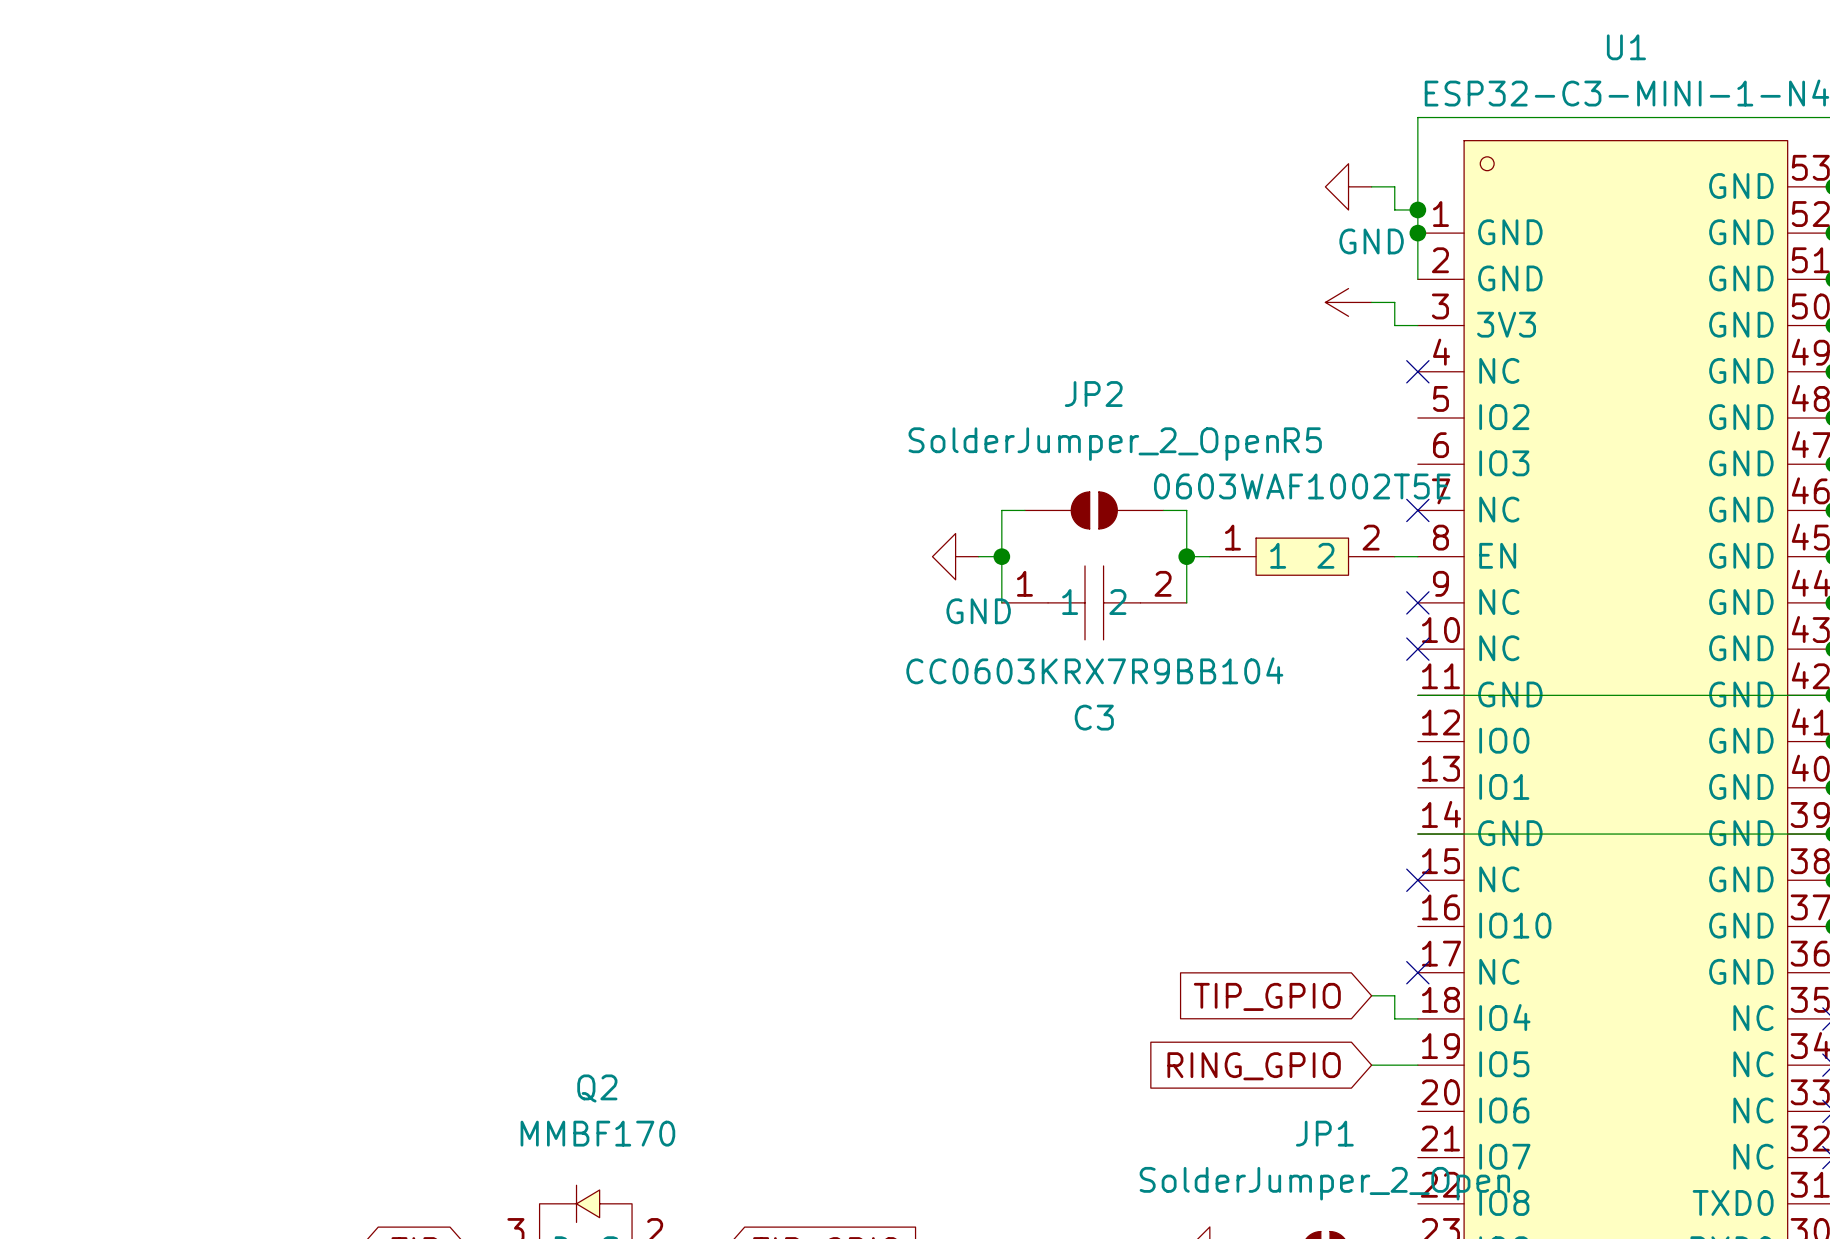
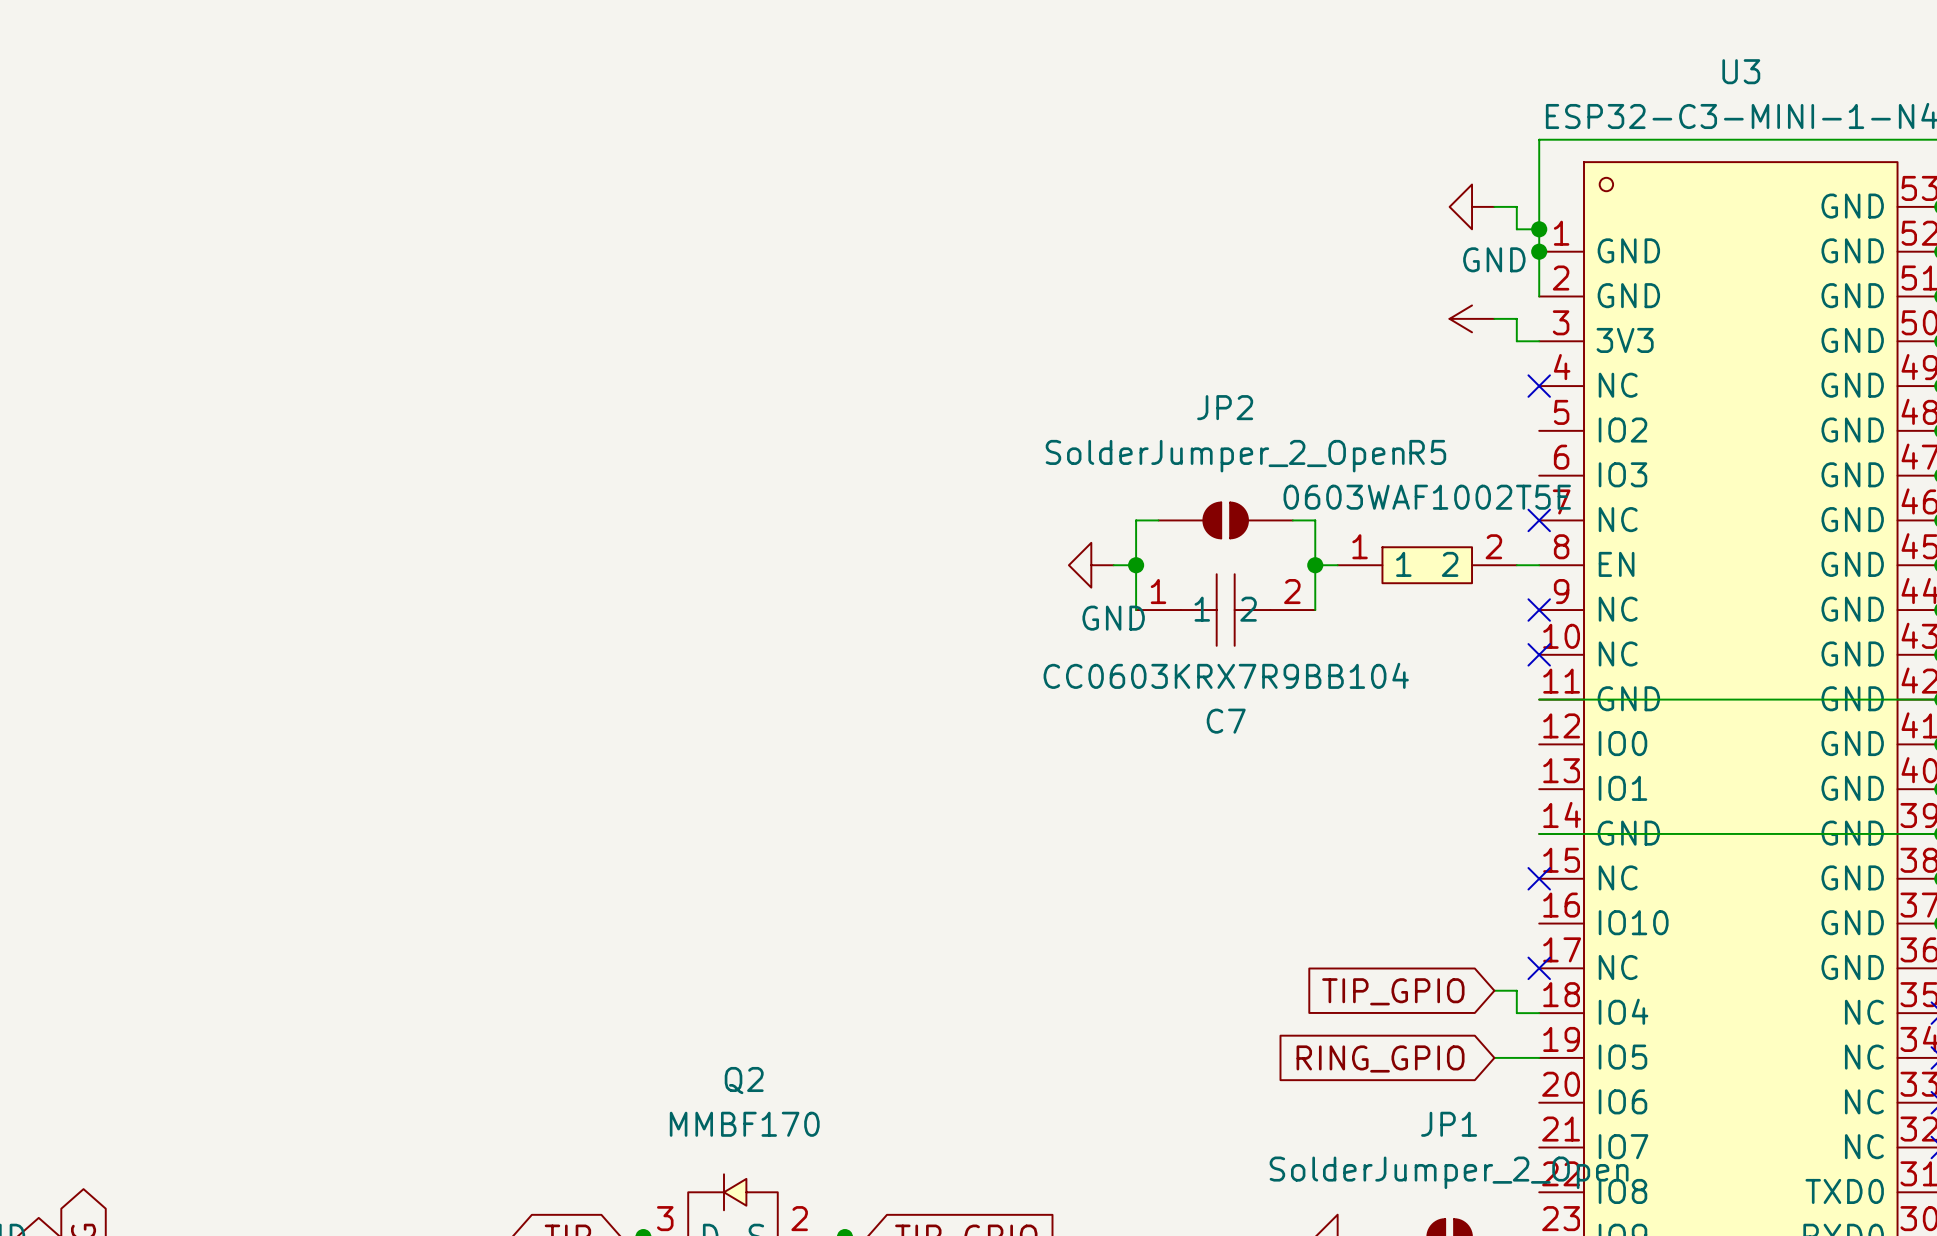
U1 name: U1 (1626, 47) -> U3 (1741, 71)
C3 name: C3 (1094, 717) -> C7 (1226, 721)

